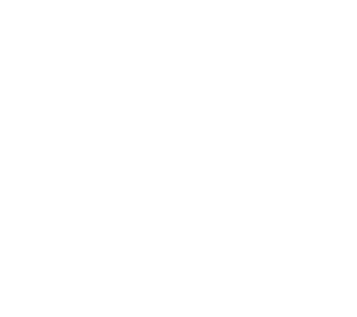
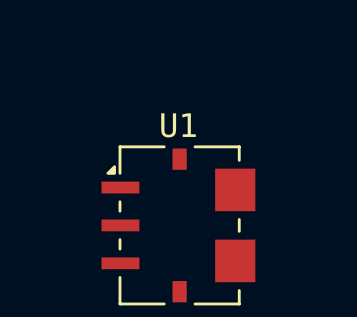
U1: none -> (178, 225)

